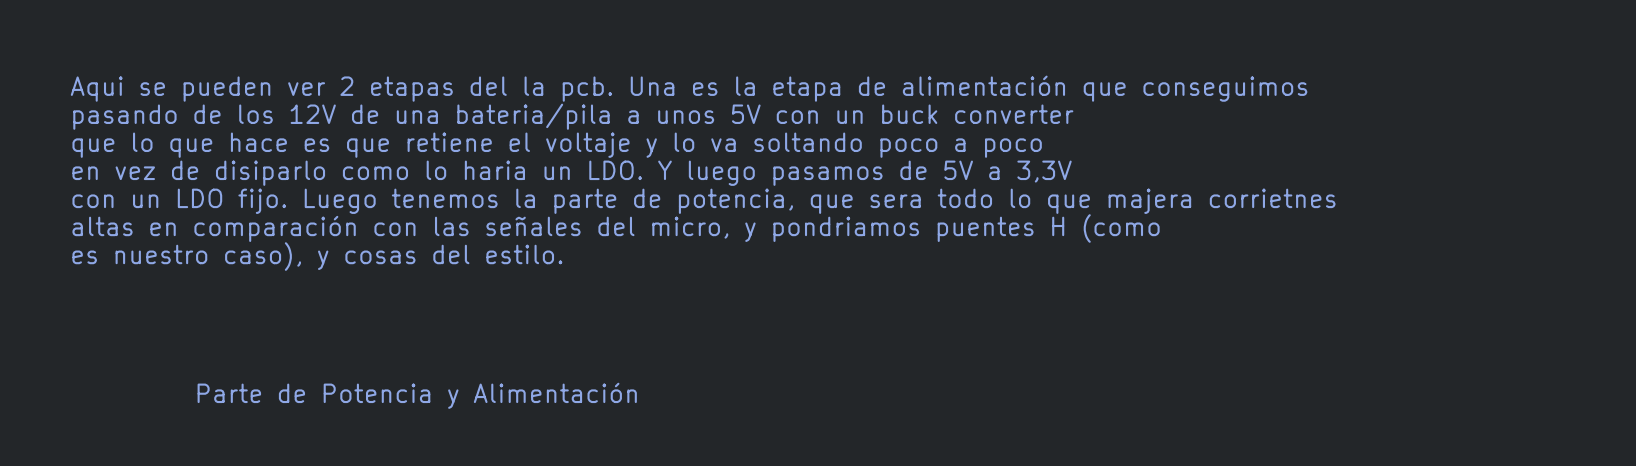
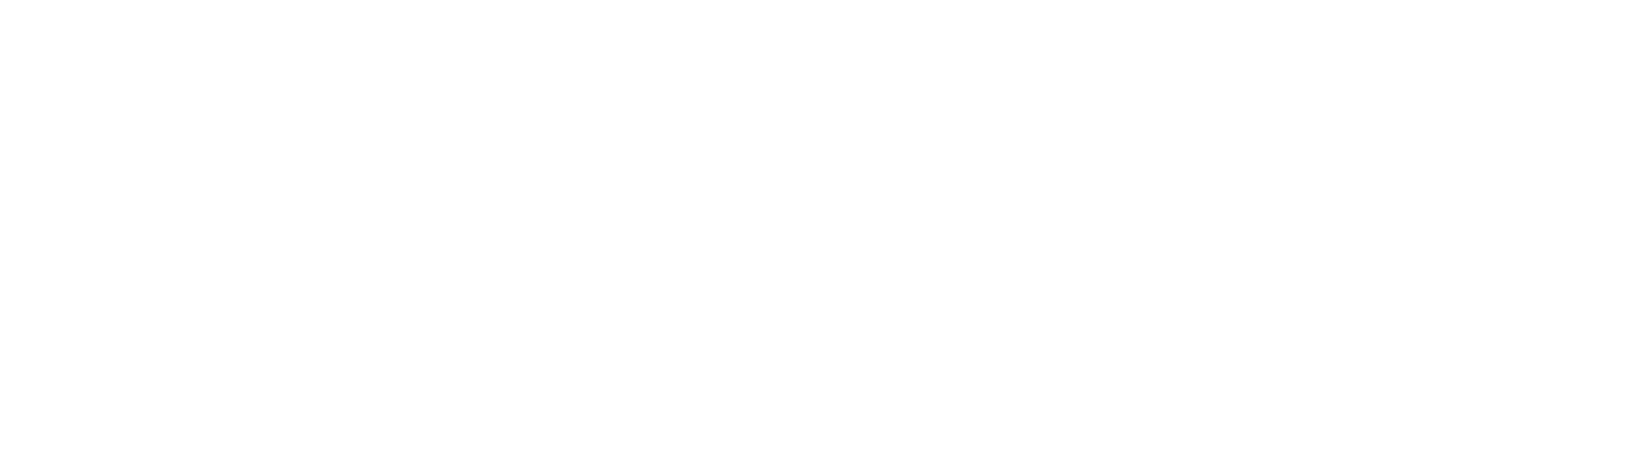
text: Aqui se pueden ver 2 etapas del la pcb. Una es la etapa de alimentación que conseguimos (689, 88) -> none
text: pasando de los 12V de una bateria/pila a unos 5V con un buck converter (573, 116) -> none
text: que lo que hace es que retiene el voltaje y lo va soltando poco a poco (557, 145) -> none
text: en vez de disiparlo como lo haria un LDO. Y luego pasamos de 5V a 3,3V (572, 173) -> none
text: con un LDO fijo. Luego tenemos la parte de potencia, que sera todo lo que majera corrietnes (703, 201) -> none
text: altas en comparación con las señales del micro, y pondriamos puentes H (como (616, 228) -> none
text: es nuestro caso), y cosas del estilo. (317, 256) -> none
text: Parte de Potencia y Alimentación (417, 395) -> none

